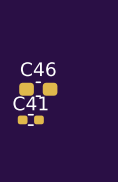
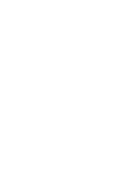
C46: (38, 89) -> none
C41: (30, 119) -> none

